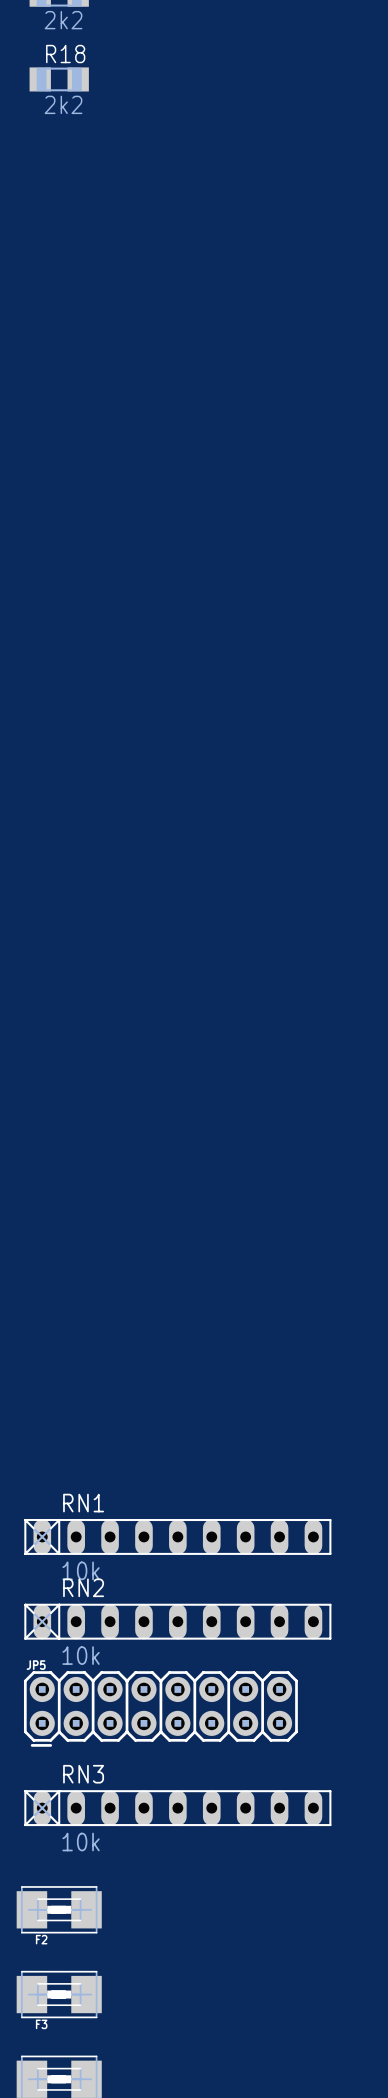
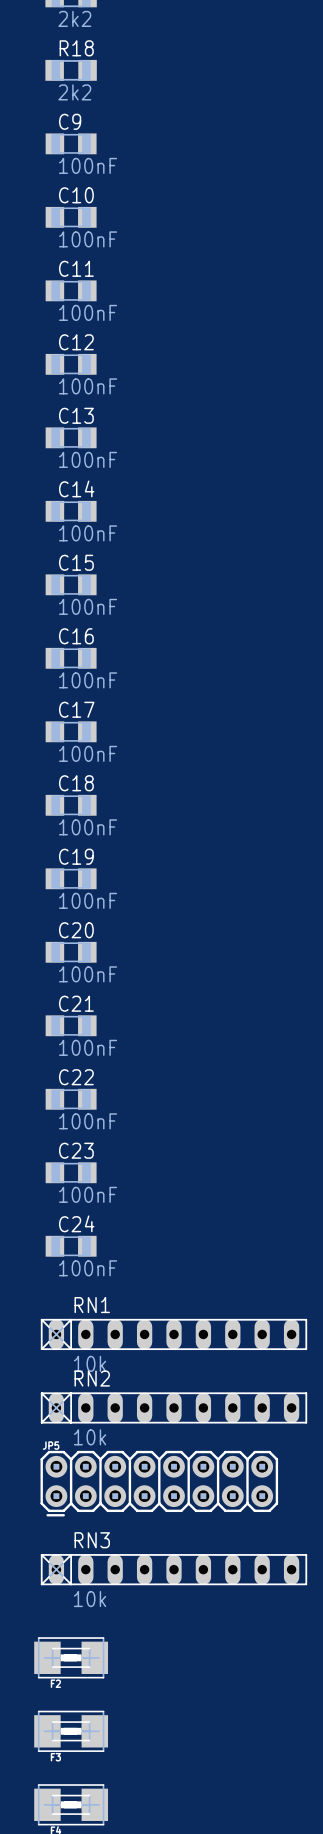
C9: none -> 100nF (71, 143)
C10: none -> 100nF (71, 217)
C11: none -> 100nF (71, 290)
C12: none -> 100nF (71, 364)
C13: none -> 100nF (71, 437)
C14: none -> 100nF (71, 511)
C15: none -> 100nF (71, 584)
C16: none -> 100nF (71, 658)
C17: none -> 100nF (71, 731)
C18: none -> 100nF (71, 805)
C19: none -> 100nF (71, 878)
C20: none -> 100nF (71, 952)
C21: none -> 100nF (71, 1025)
C22: none -> 100nF (71, 1099)
C23: none -> 100nF (71, 1172)
C24: none -> 100nF (71, 1246)

